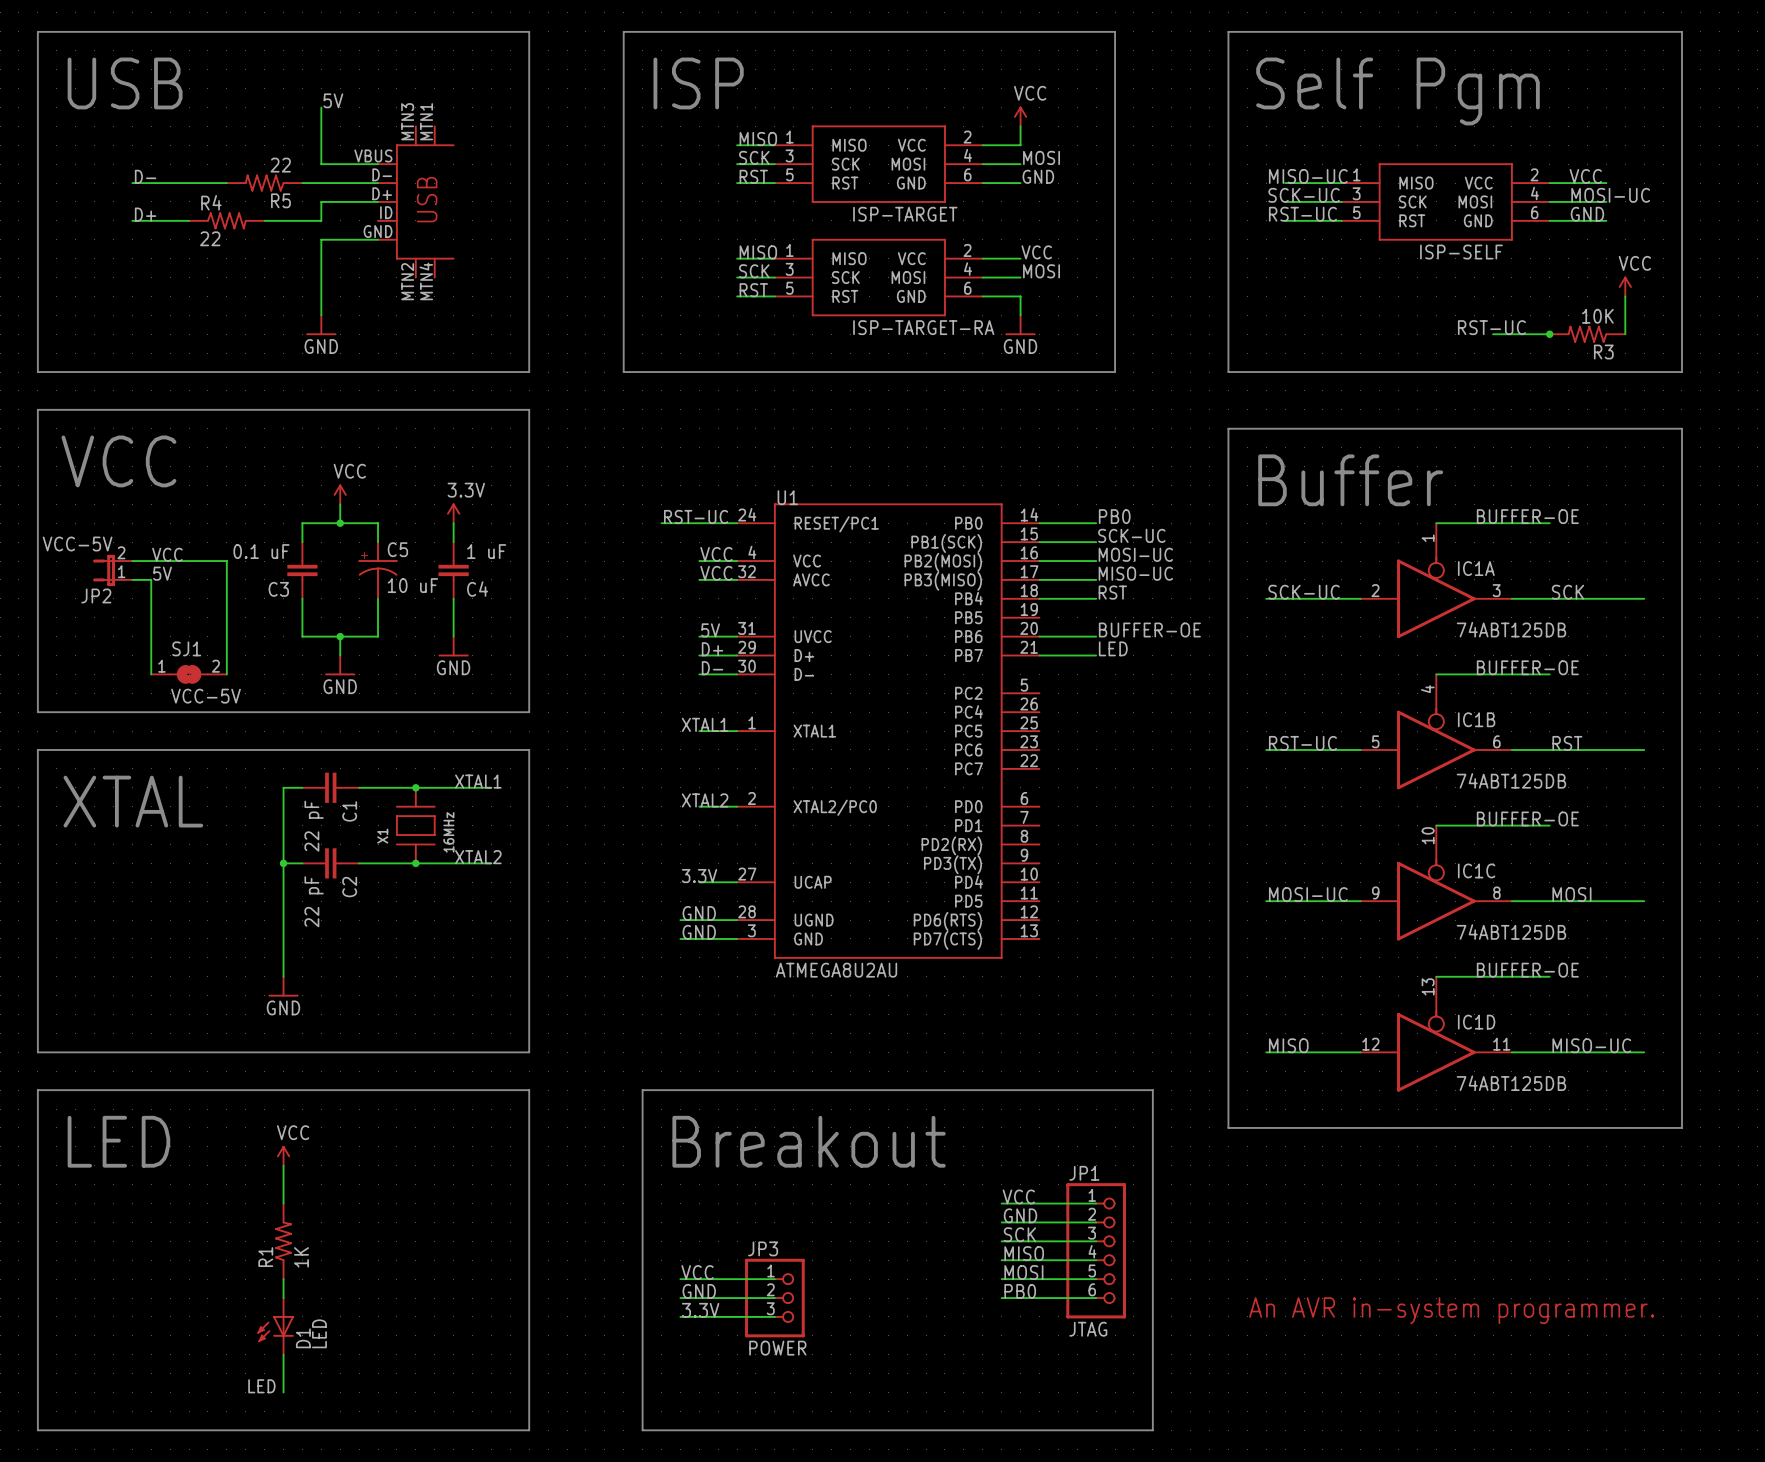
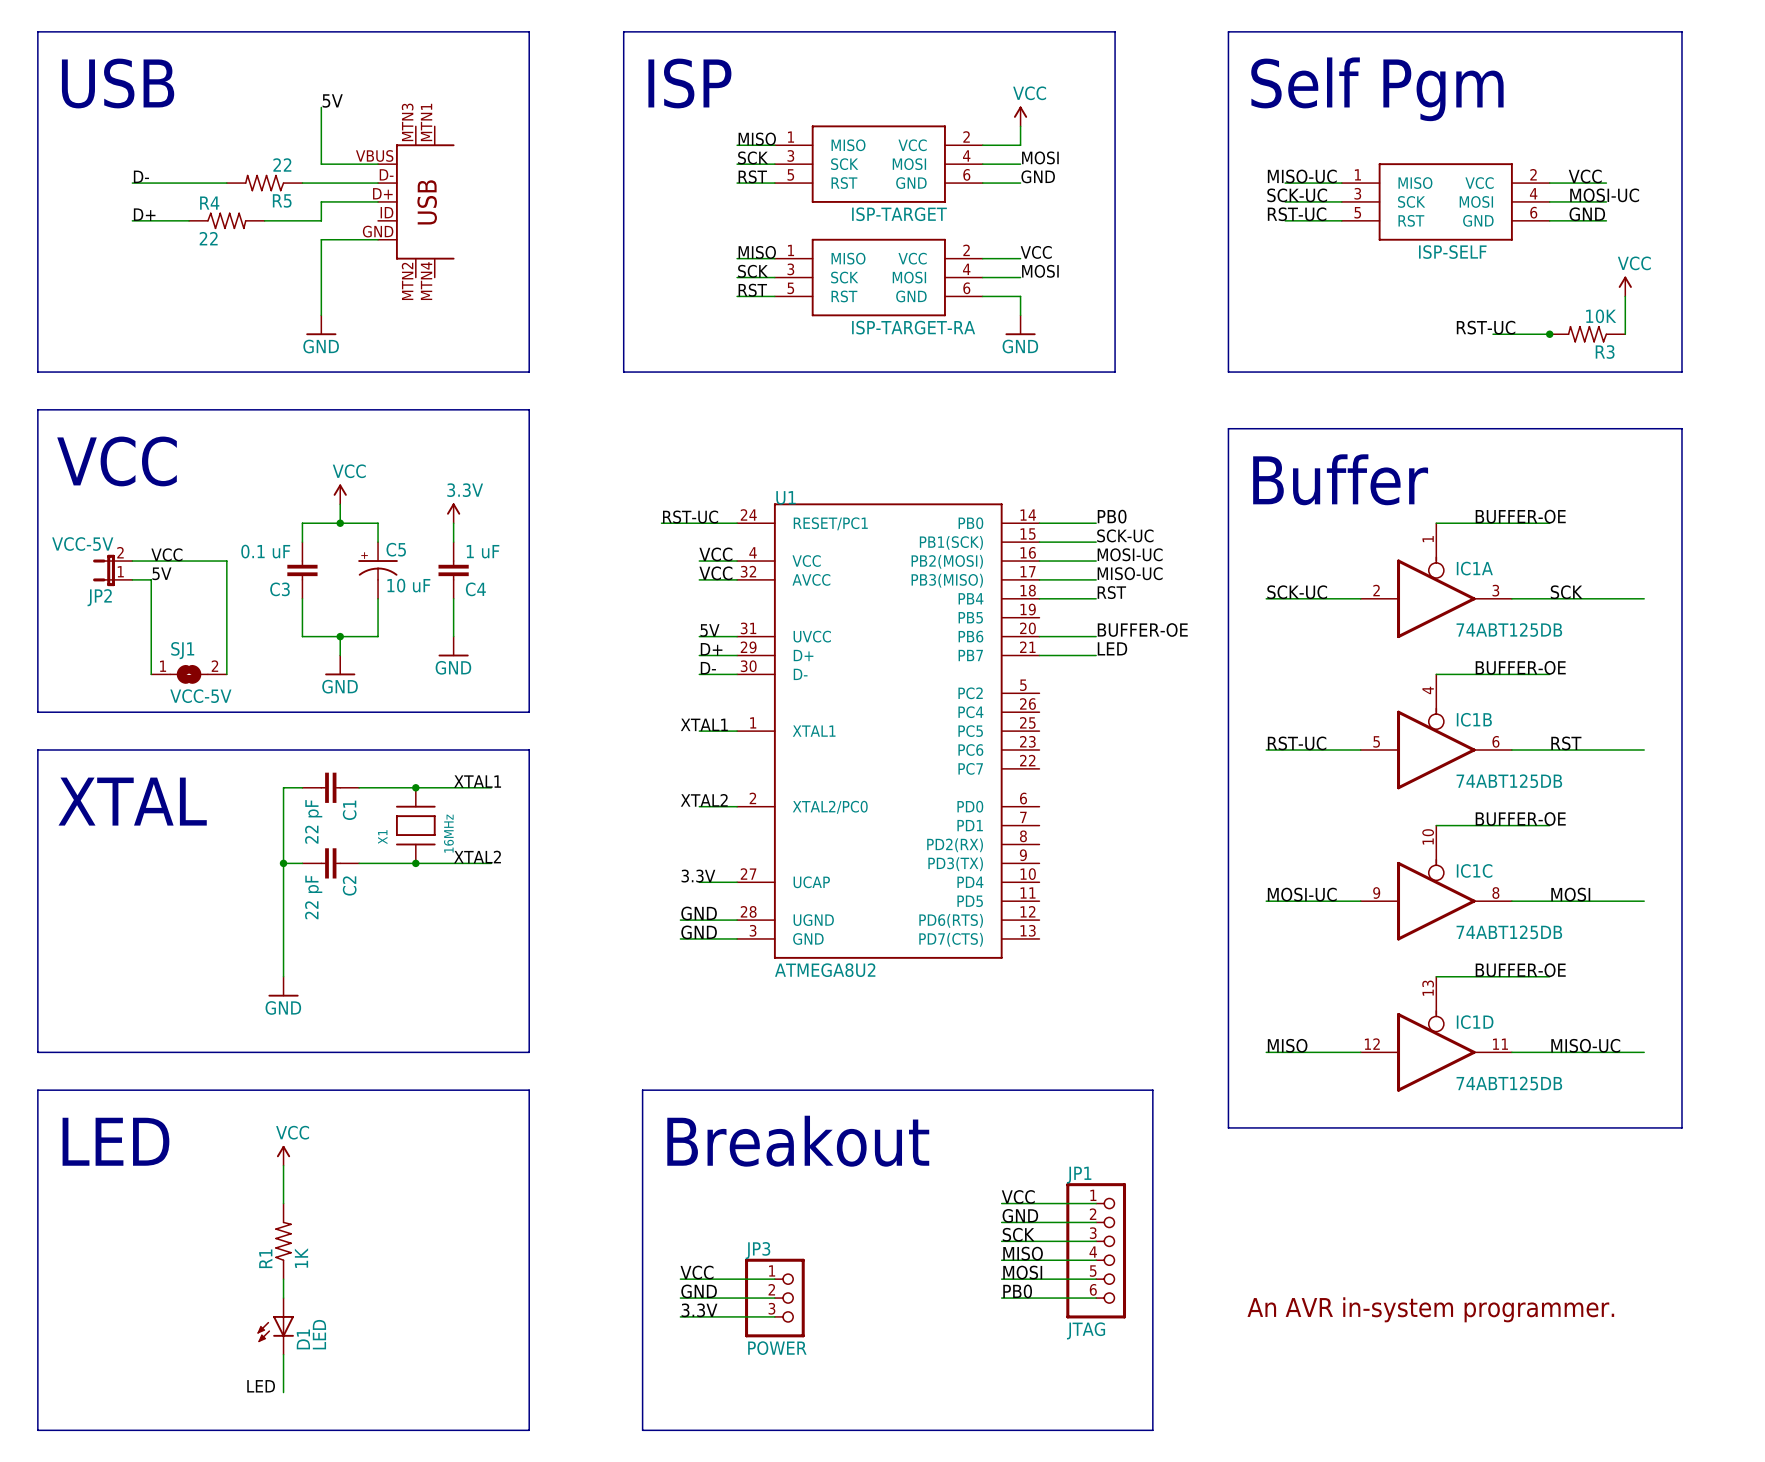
U1 value: ATMEGA8U2AU (836, 970) -> ATMEGA8U2 (825, 970)

